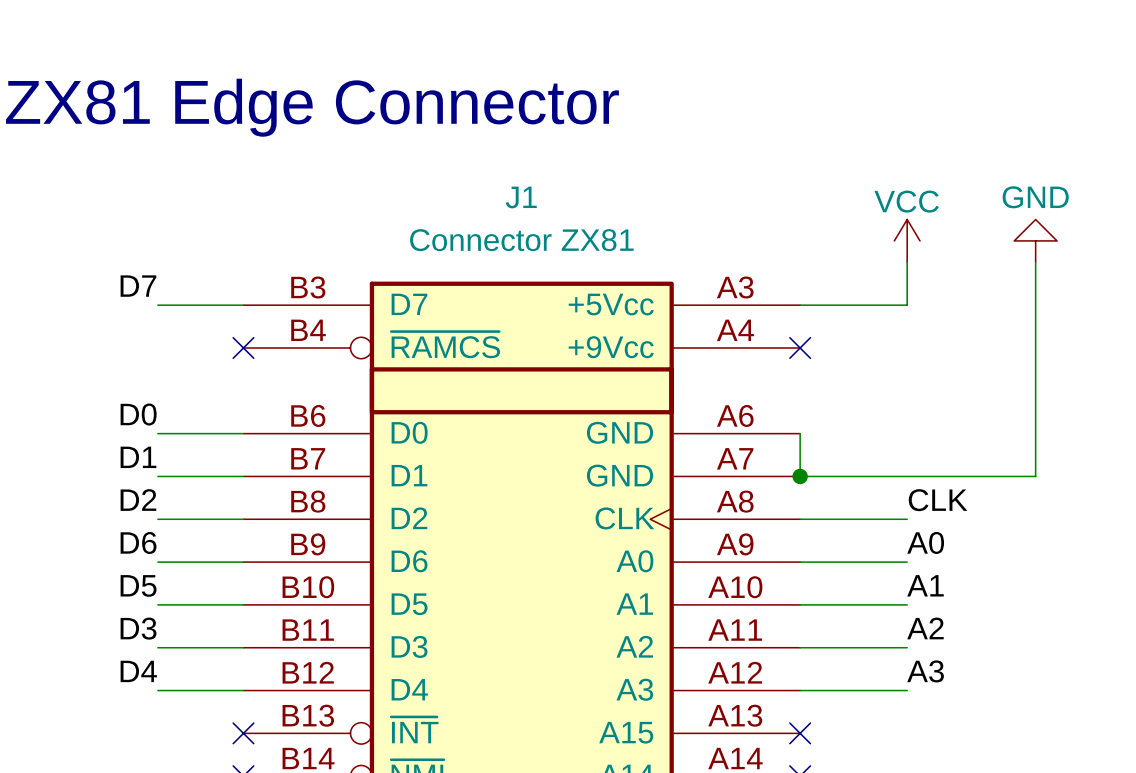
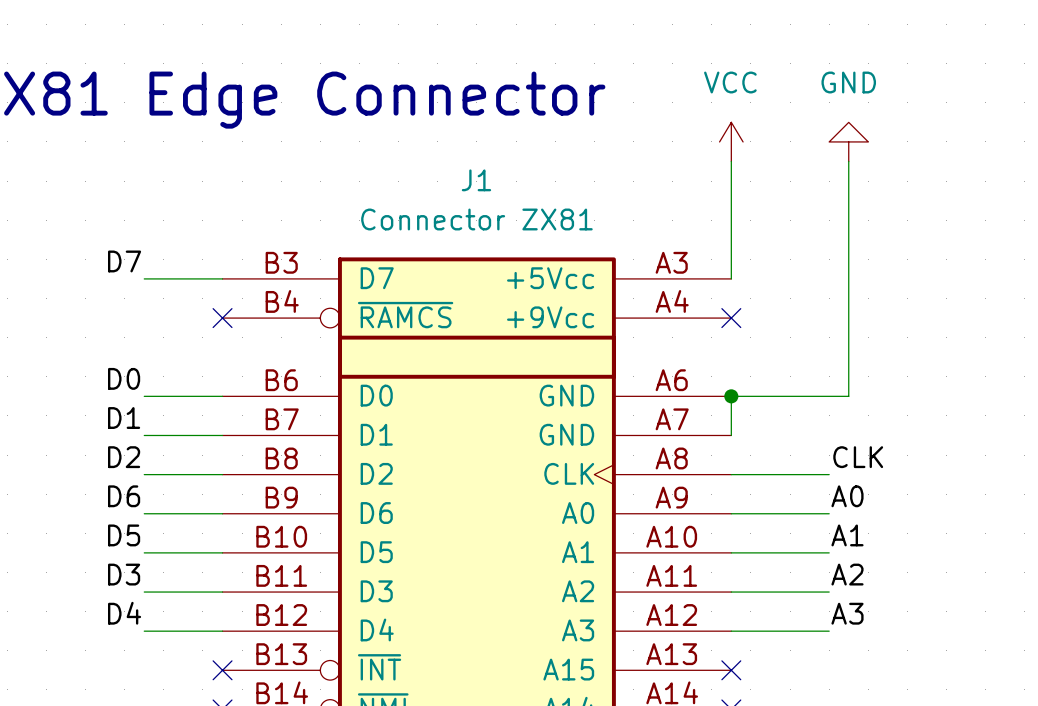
wire: none -> (848, 161) (848, 396) (731, 396)
power symbol text position: GND (1035, 197) -> GND (848, 82)
power symbol text position: VCC (906, 201) -> VCC (730, 82)
power symbol position: VCC (907, 240) -> VCC (731, 141)
power symbol position: GND (1035, 240) -> GND (848, 141)
wire: (907, 262) (907, 305) (800, 305) -> (731, 161) (731, 278)
wire: (1035, 262) (1035, 476) (800, 476) -> none
junction position: (800, 476) -> (731, 396)

